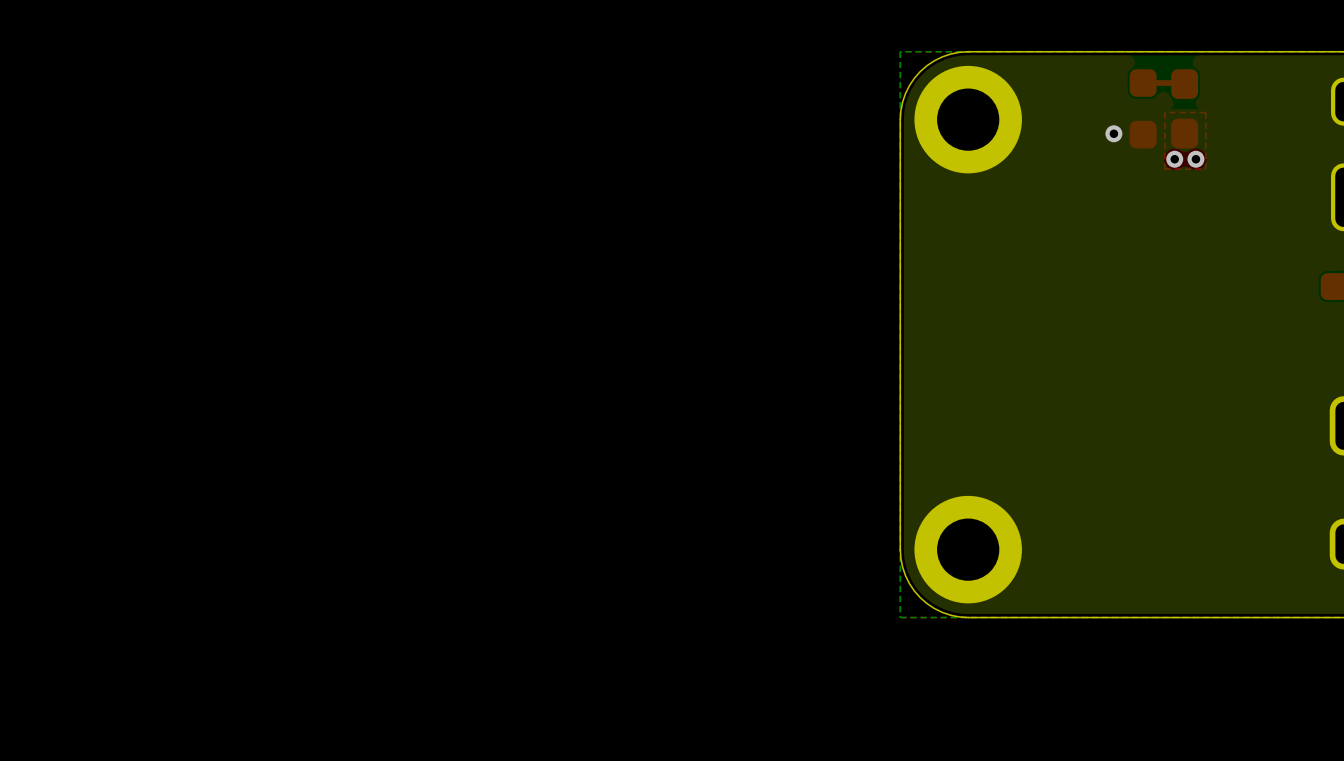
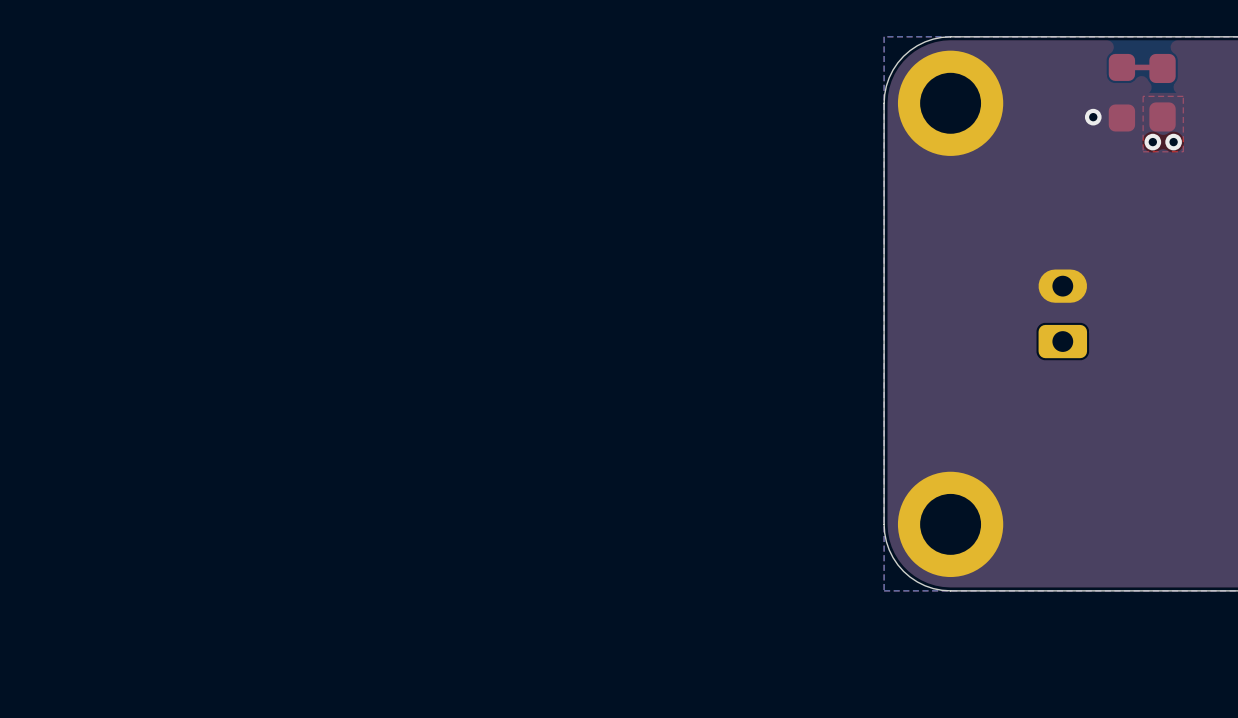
part: none -> (1062, 313)

